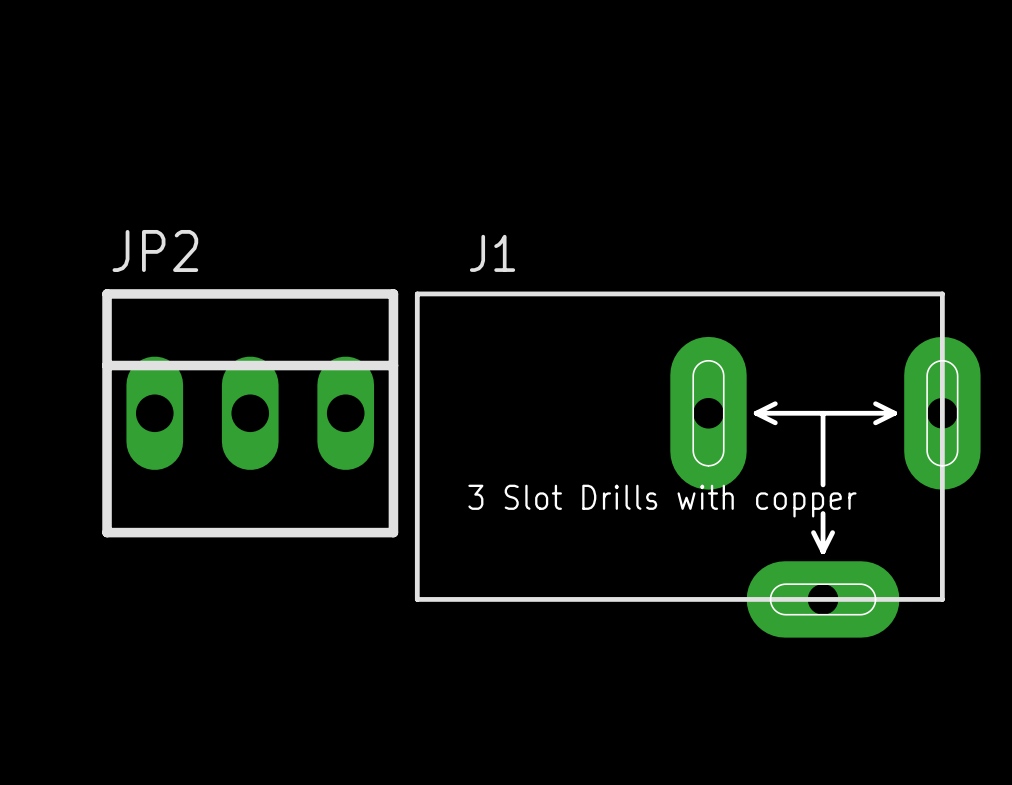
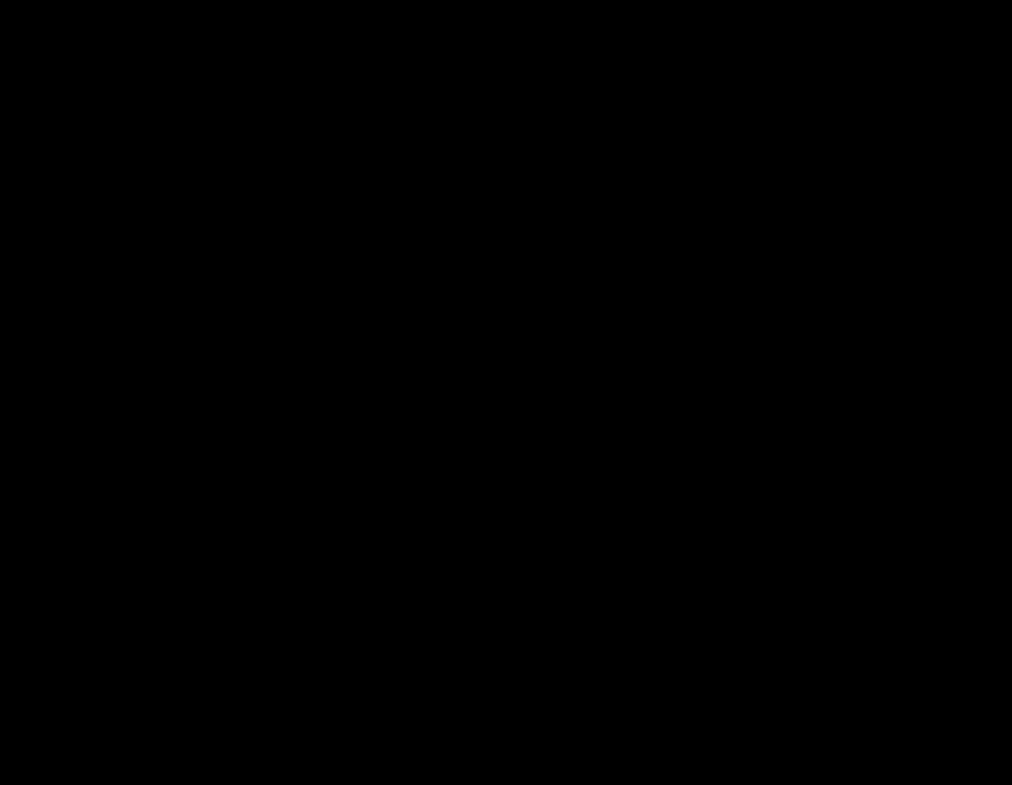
JP2: (250, 413) -> none
J1: (697, 464) -> none

